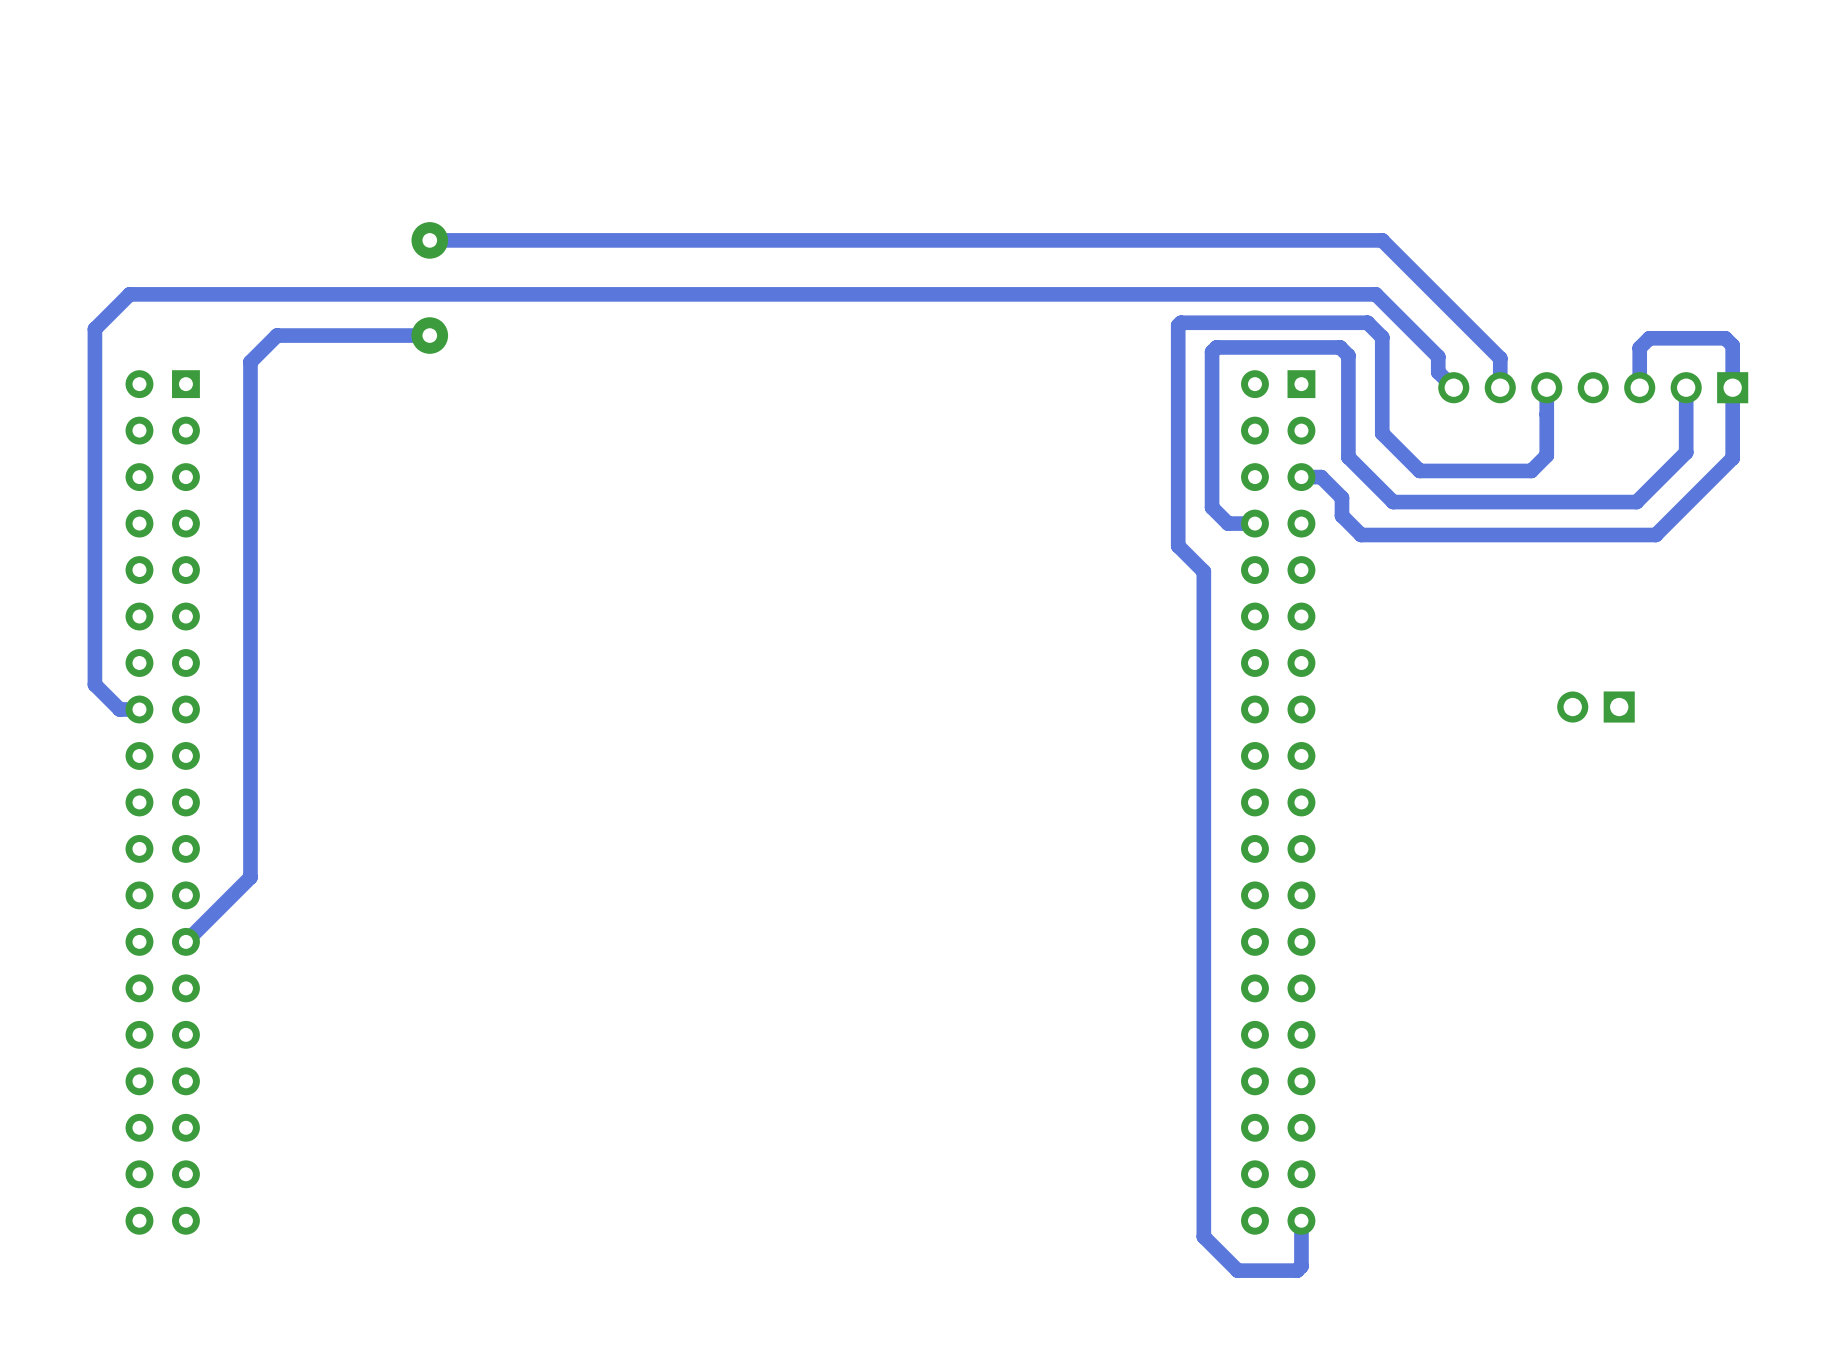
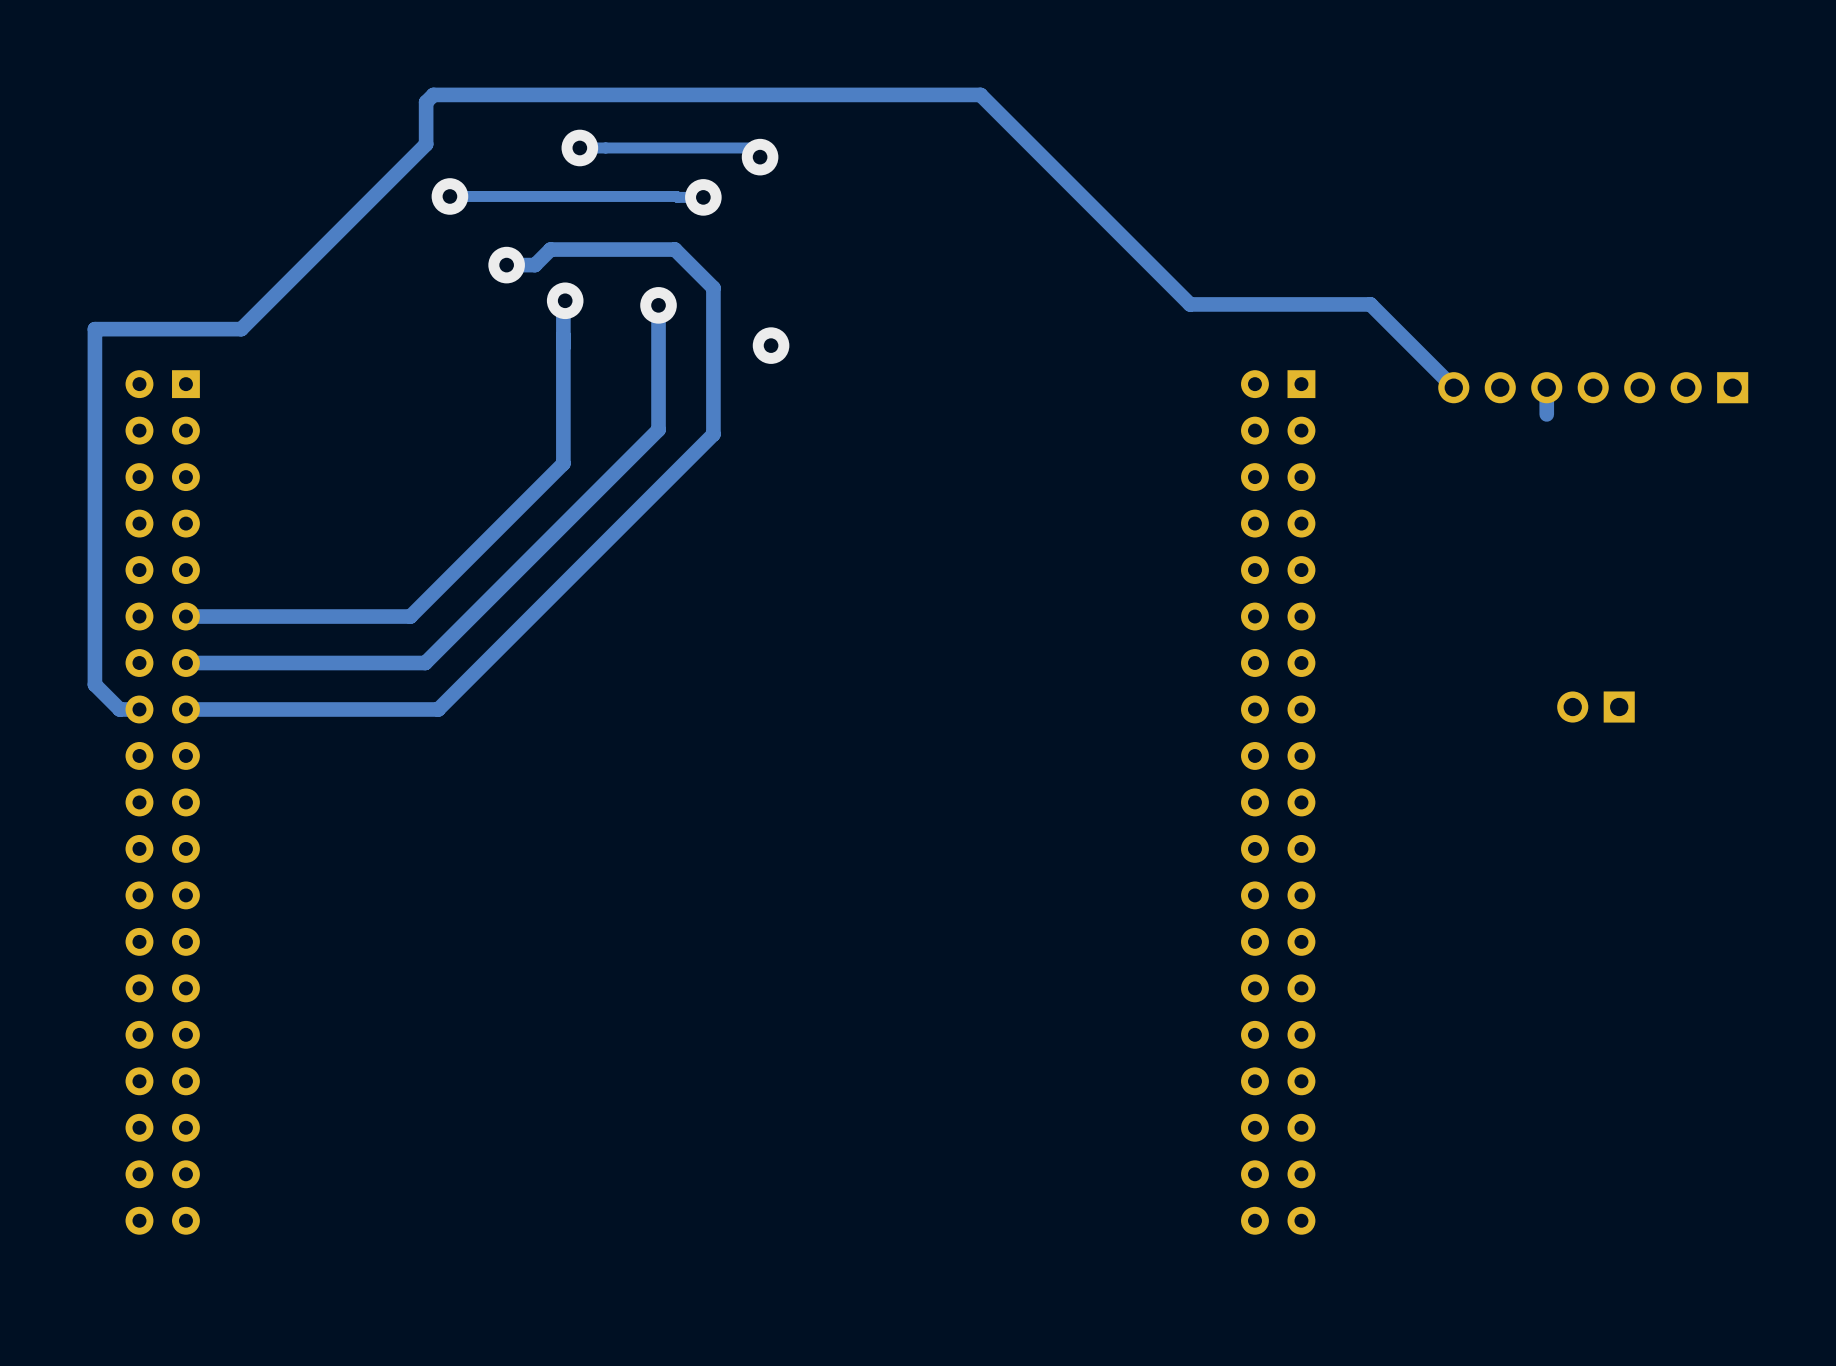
track: none -> (579, 147) (750, 147) (760, 157)
via: none -> (579, 147)
via: none -> (760, 157)
track: none -> (449, 196) (703, 197)
via: none -> (449, 196)
via: none -> (703, 197)
track: (429, 240) (1382, 240) (1500, 358) (1500, 387) -> none
via: (429, 240) -> none
track: none -> (506, 265) (535, 265) (550, 249) (674, 249) (713, 287) (713, 434) (438, 709) (185, 709)
via: none -> (506, 265)
track: none -> (565, 300) (563, 302) (563, 463) (410, 616) (185, 616)
via: none -> (565, 300)
track: none -> (658, 305) (658, 429) (425, 663) (185, 663)
via: none -> (658, 305)
track: (94, 329) (129, 294) (1375, 294) (1438, 356) (1438, 372) -> (94, 329) (241, 329) (426, 144) (426, 102) (433, 94) (980, 94) (1190, 304) (1370, 304) (1438, 372)
track: (429, 335) (276, 335) (250, 362) (250, 877) (185, 941) -> none
via: (429, 335) -> none
via: none -> (771, 345)
track: (1639, 387) (1639, 347) (1649, 338) (1725, 338) (1732, 345) (1732, 458) (1655, 535) (1361, 535) (1341, 515) (1341, 497) (1321, 477) (1301, 477) -> none
track: (1686, 387) (1686, 452) (1636, 502) (1393, 502) (1348, 457) (1348, 355) (1340, 347) (1216, 347) (1212, 352) (1212, 507) (1228, 523) (1254, 523) -> none
track: (1546, 414) (1546, 455) (1531, 470) (1419, 470) (1382, 433) (1382, 337) (1367, 322) (1180, 322) (1178, 325) (1178, 545) (1203, 571) (1203, 1236) (1237, 1270) (1297, 1270) (1301, 1266) (1301, 1220) -> none

